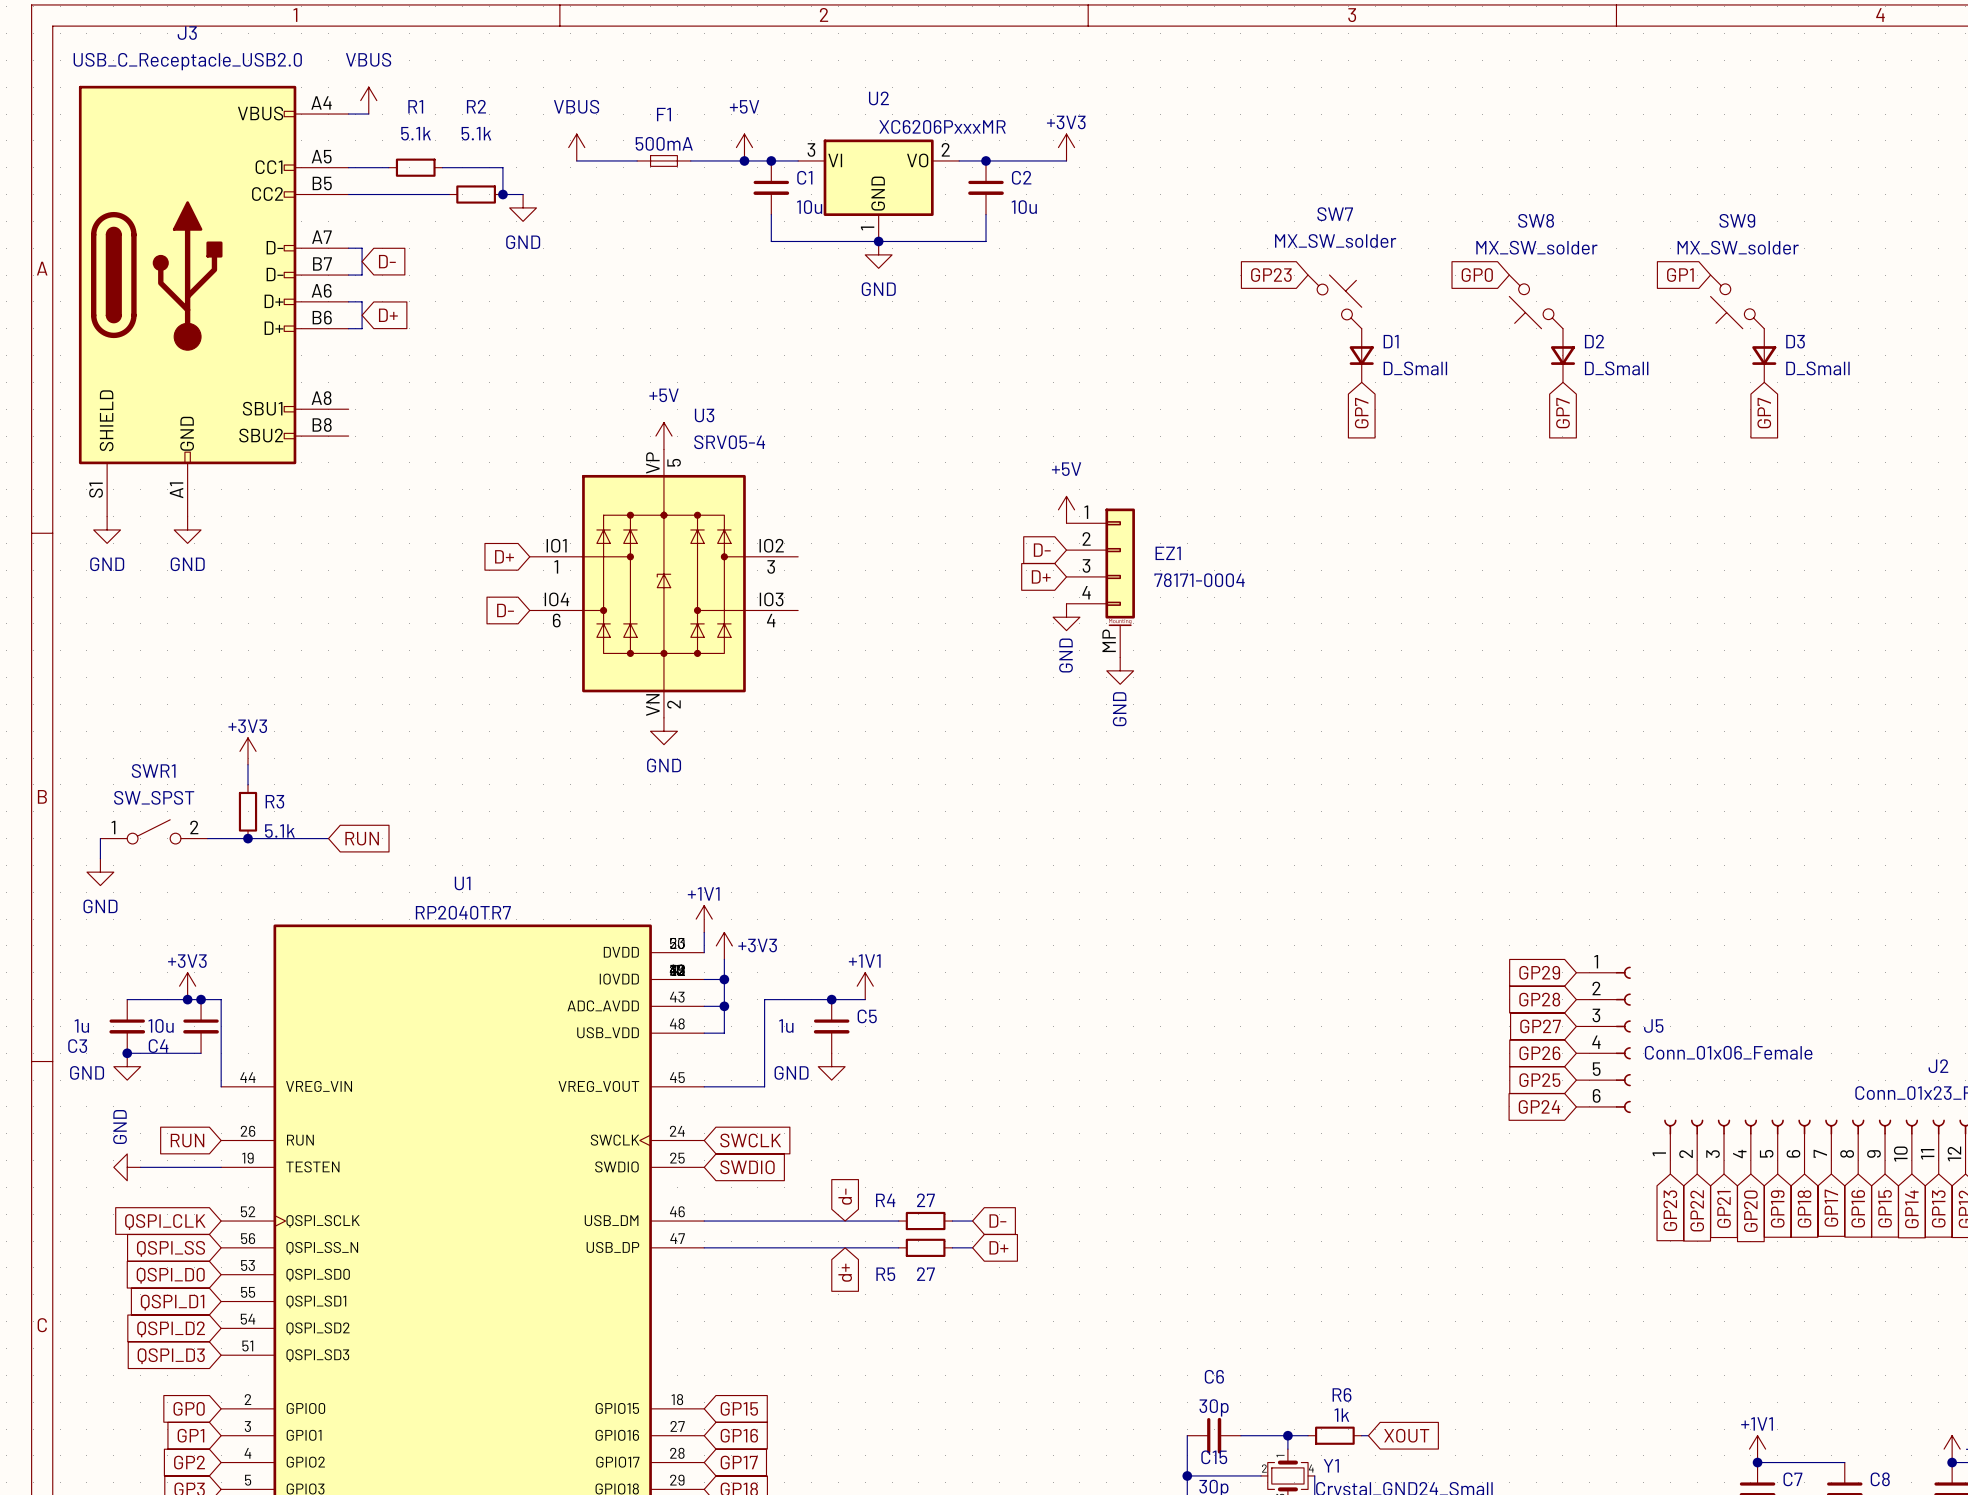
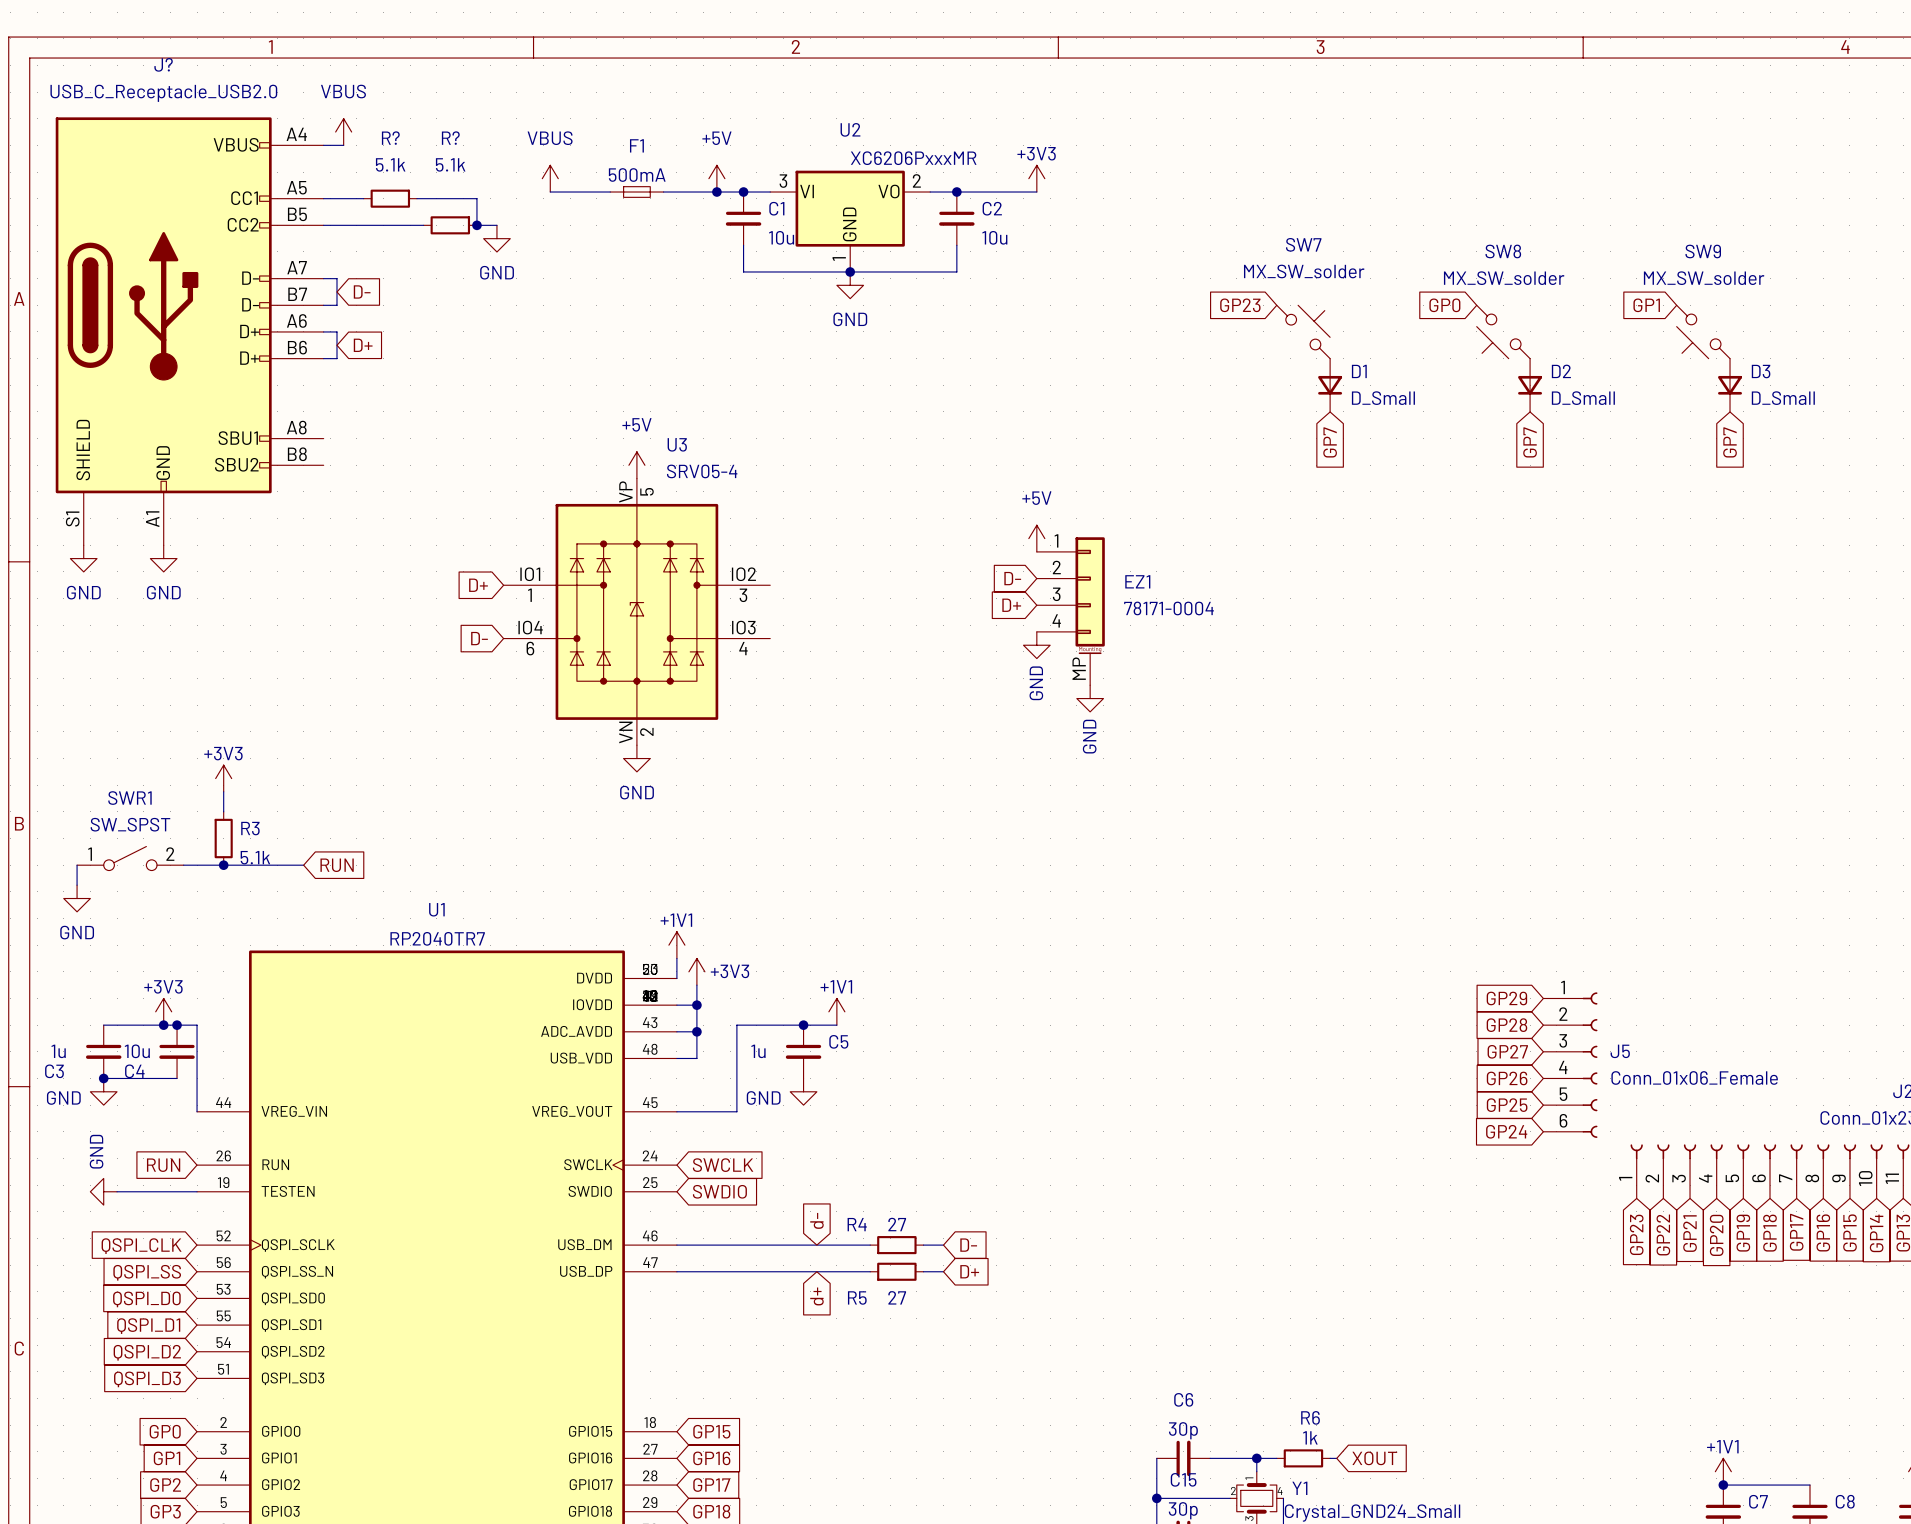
J3 name: J3 (187, 33) -> J? (163, 64)
R1 name: R1 (415, 106) -> R? (390, 138)
R2 name: R2 (476, 106) -> R? (450, 138)

